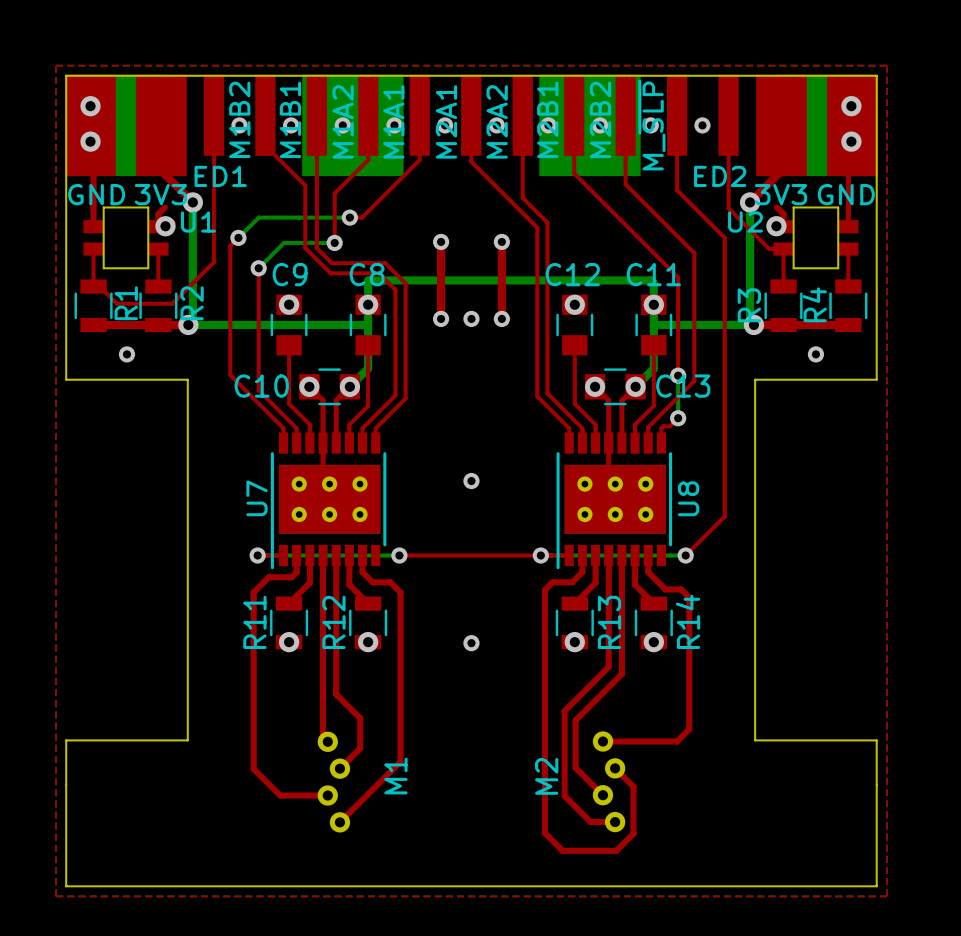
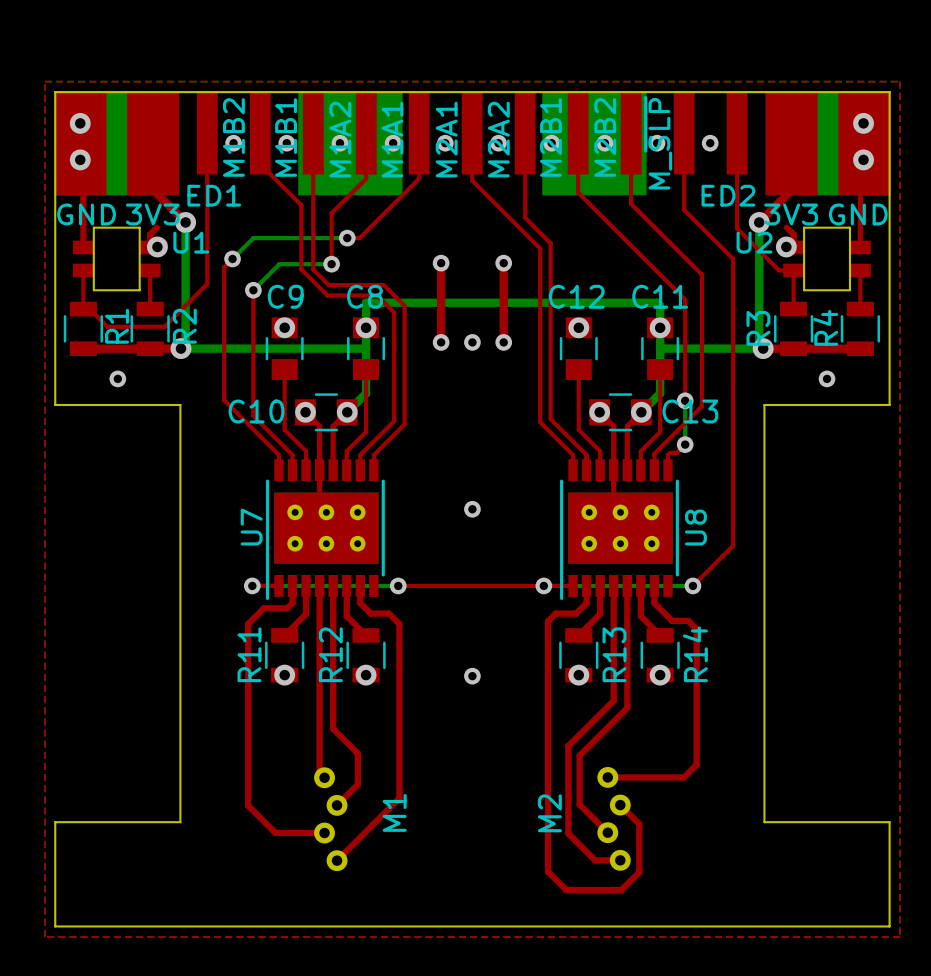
board edge: (187, 740) (66, 740) (66, 784) -> (180, 776) (180, 822) (55, 822)
board edge: (755, 740) (876, 740) (876, 784) -> (764, 776) (764, 822) (889, 822)

